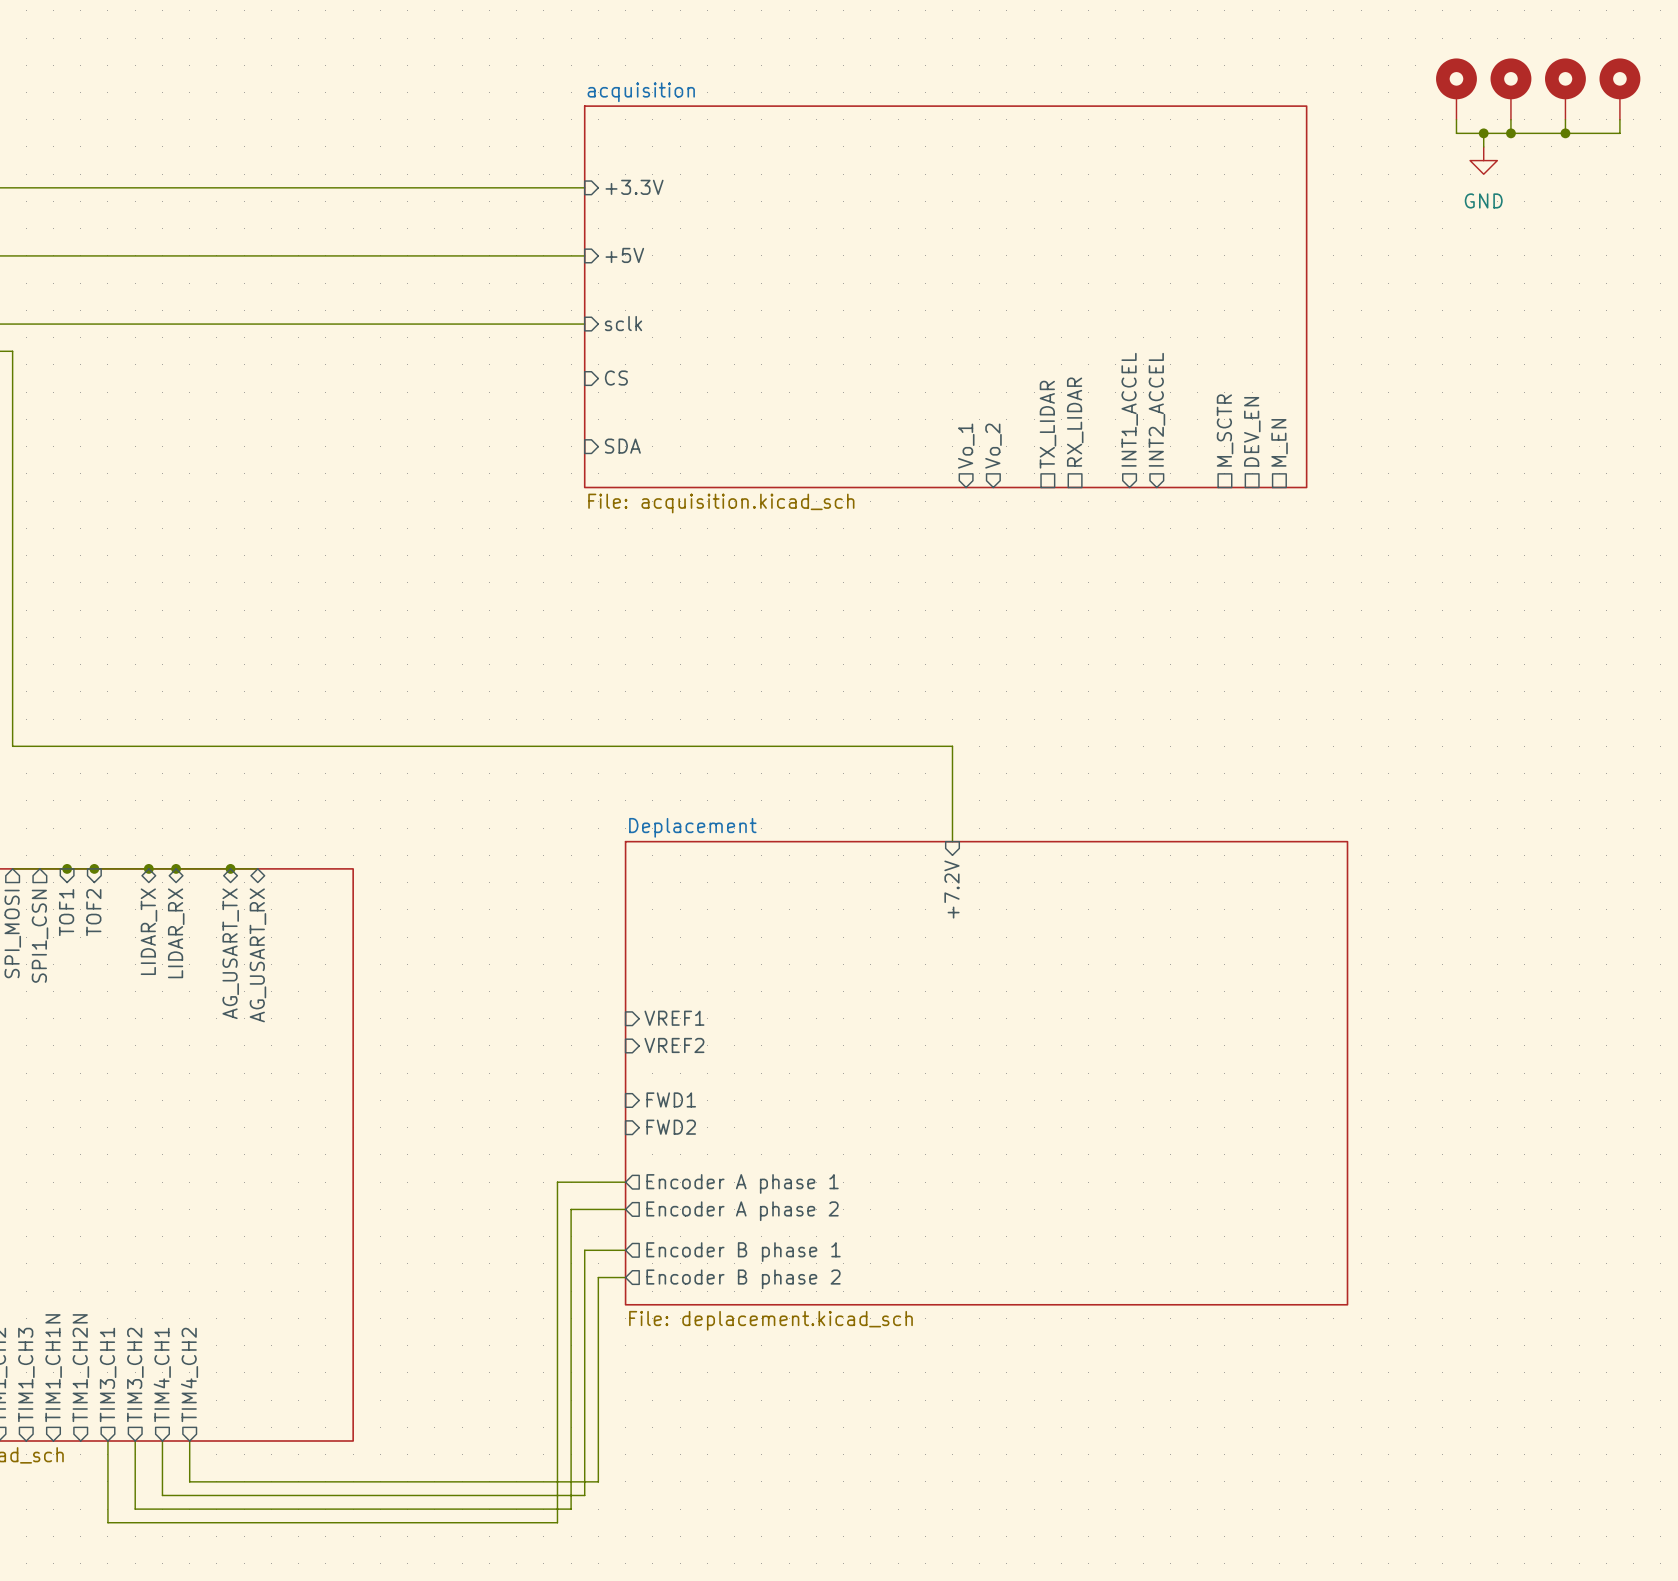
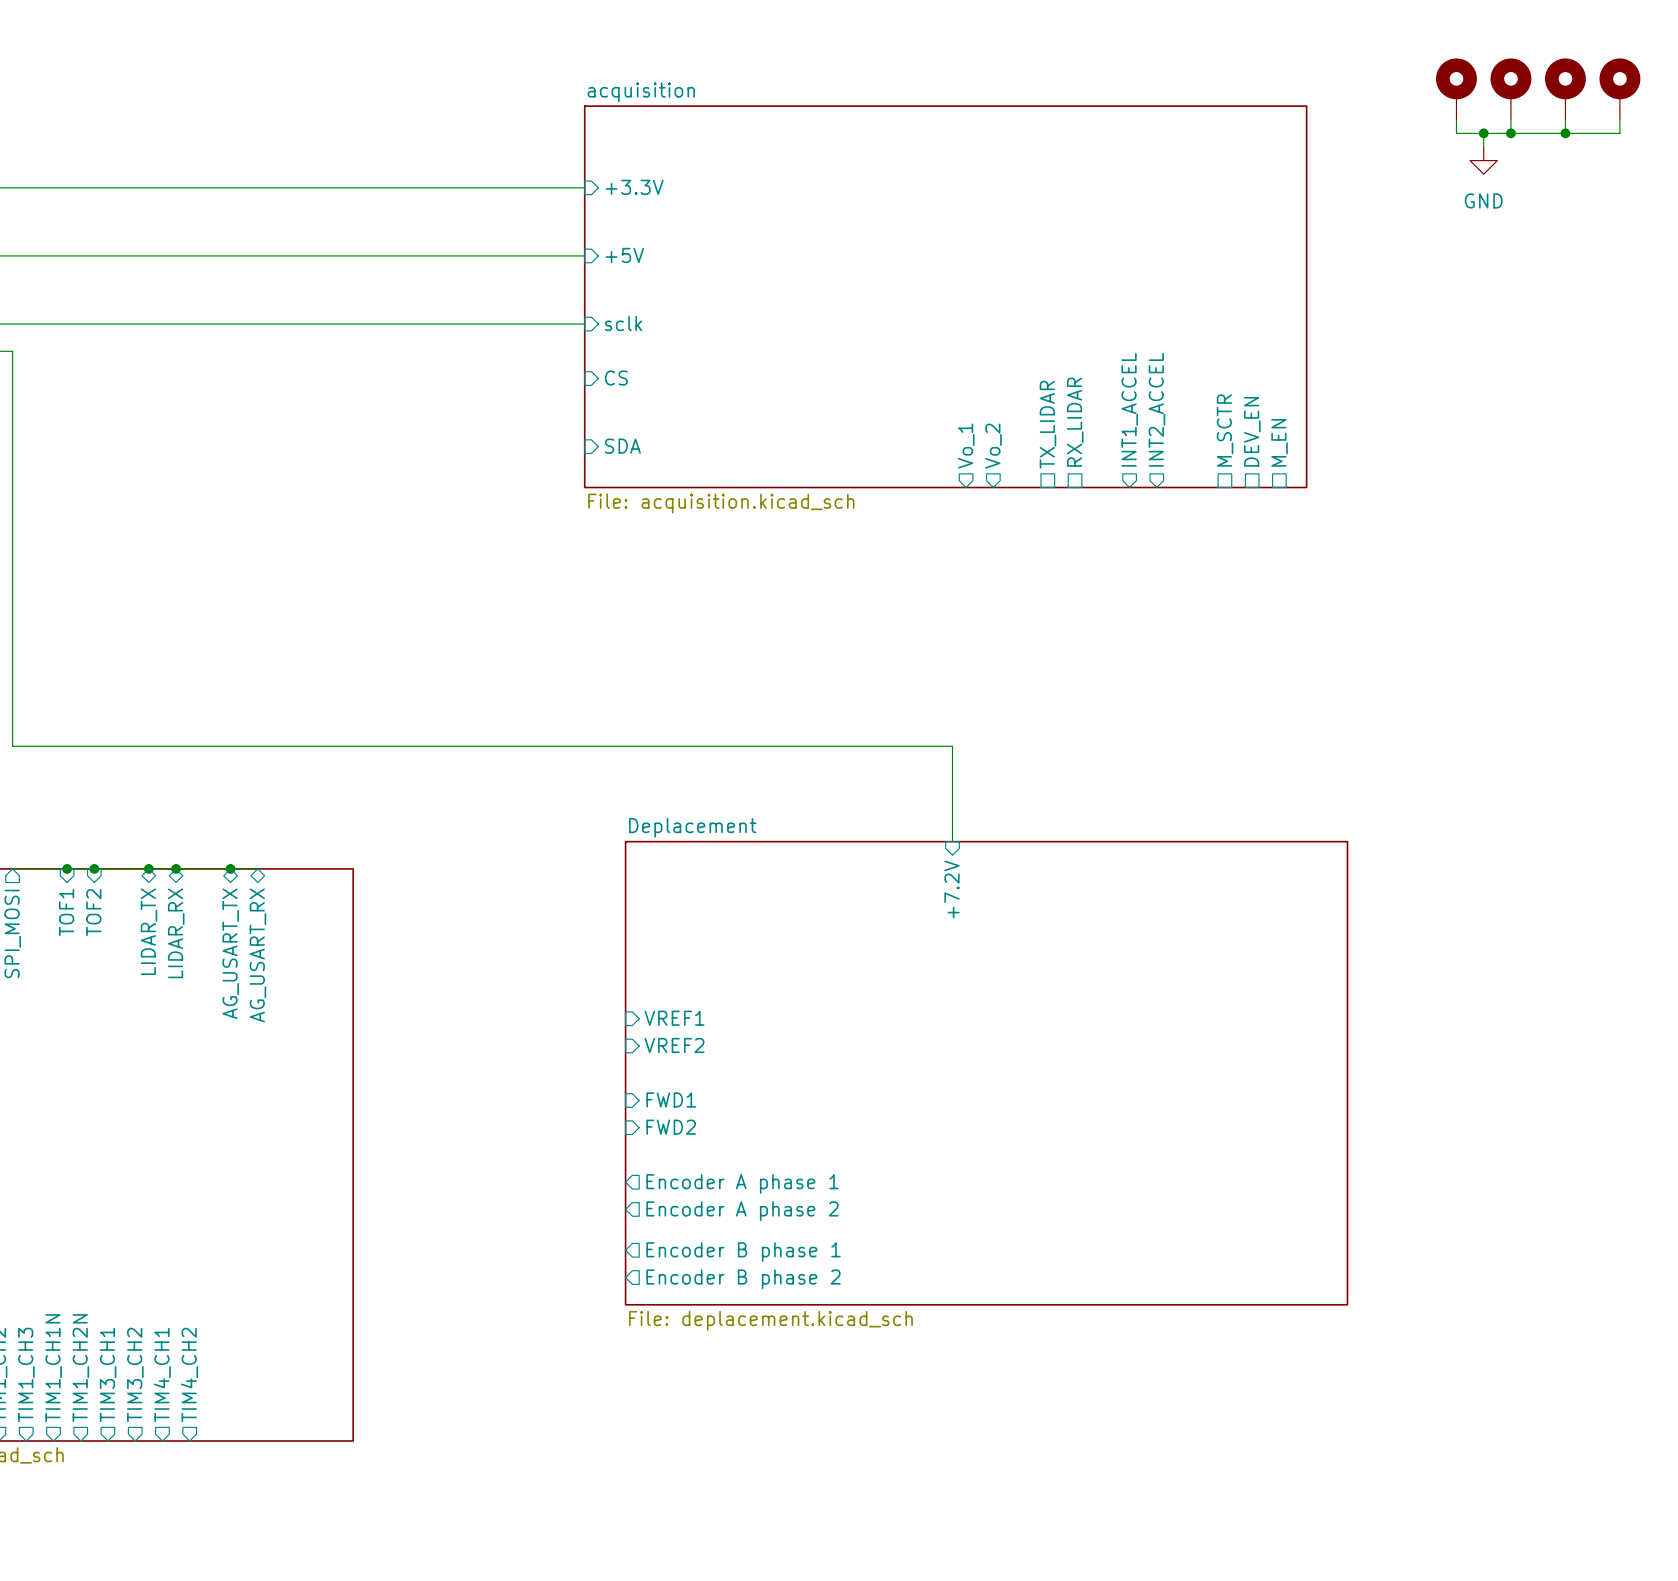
sheet pin: SPI1_CSN (40, 936) -> none
wire: (625, 1182) (557, 1182) (557, 1522) (107, 1522) (107, 1440) -> none
wire: (625, 1209) (571, 1209) (571, 1509) (135, 1509) (135, 1440) -> none
wire: (625, 1250) (584, 1250) (584, 1495) (162, 1495) (162, 1440) -> none
wire: (625, 1277) (598, 1277) (598, 1481) (189, 1481) (189, 1440) -> none

